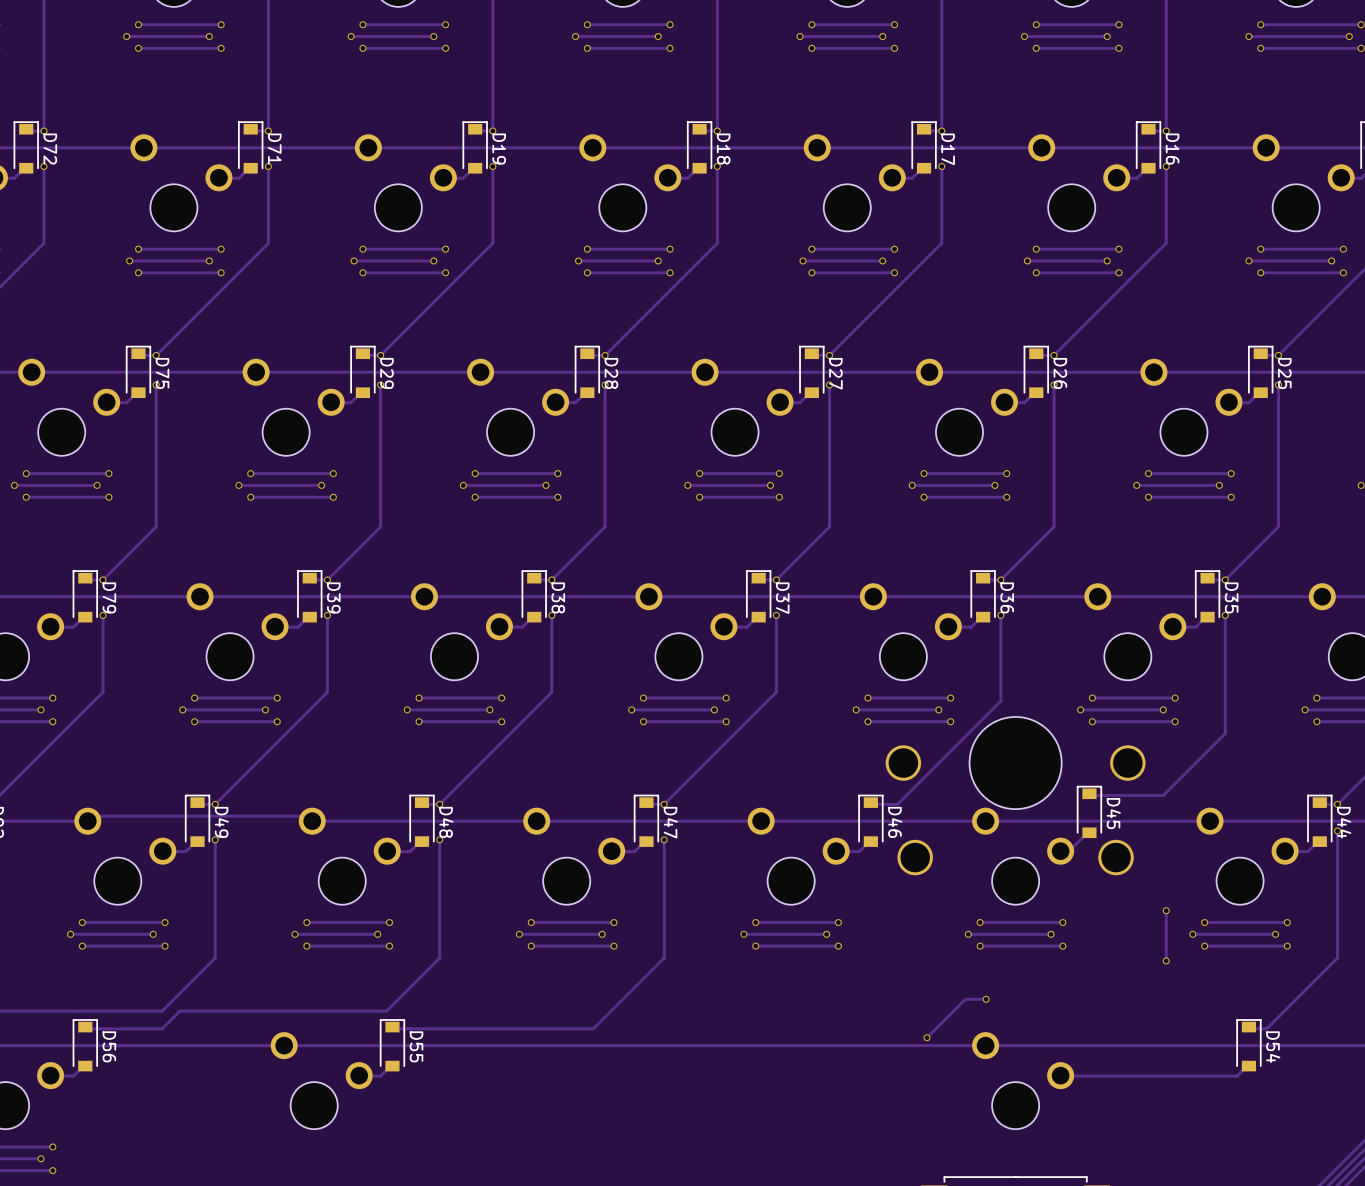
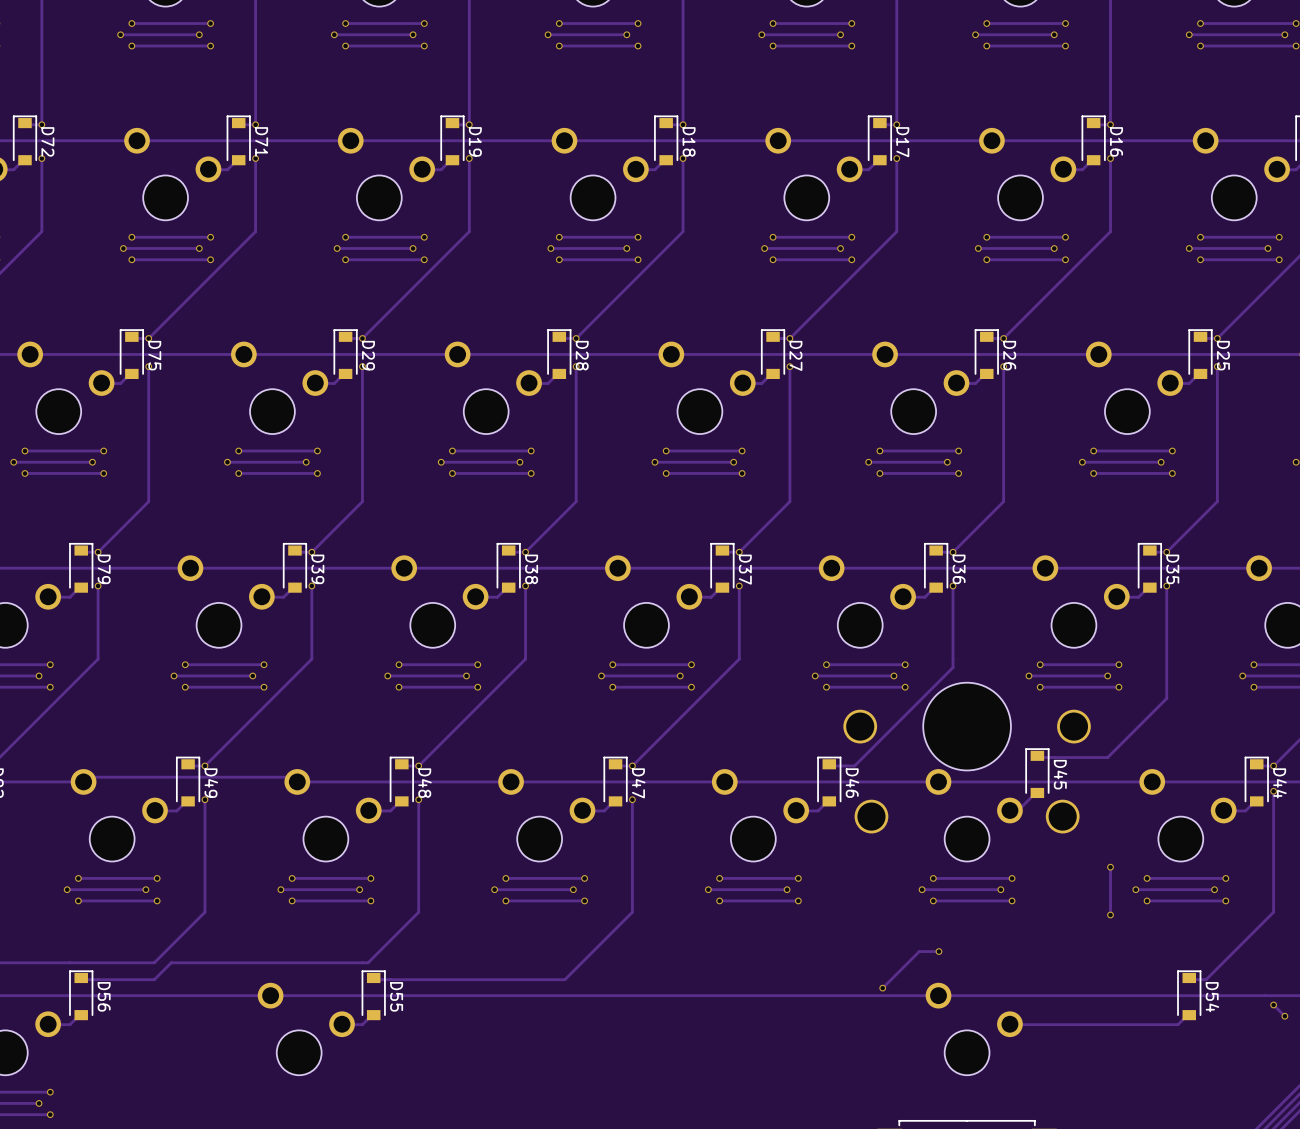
track: none -> (1273, 1004) (1284, 1016)
via: none -> (1273, 1004)
via: none -> (1284, 1016)

